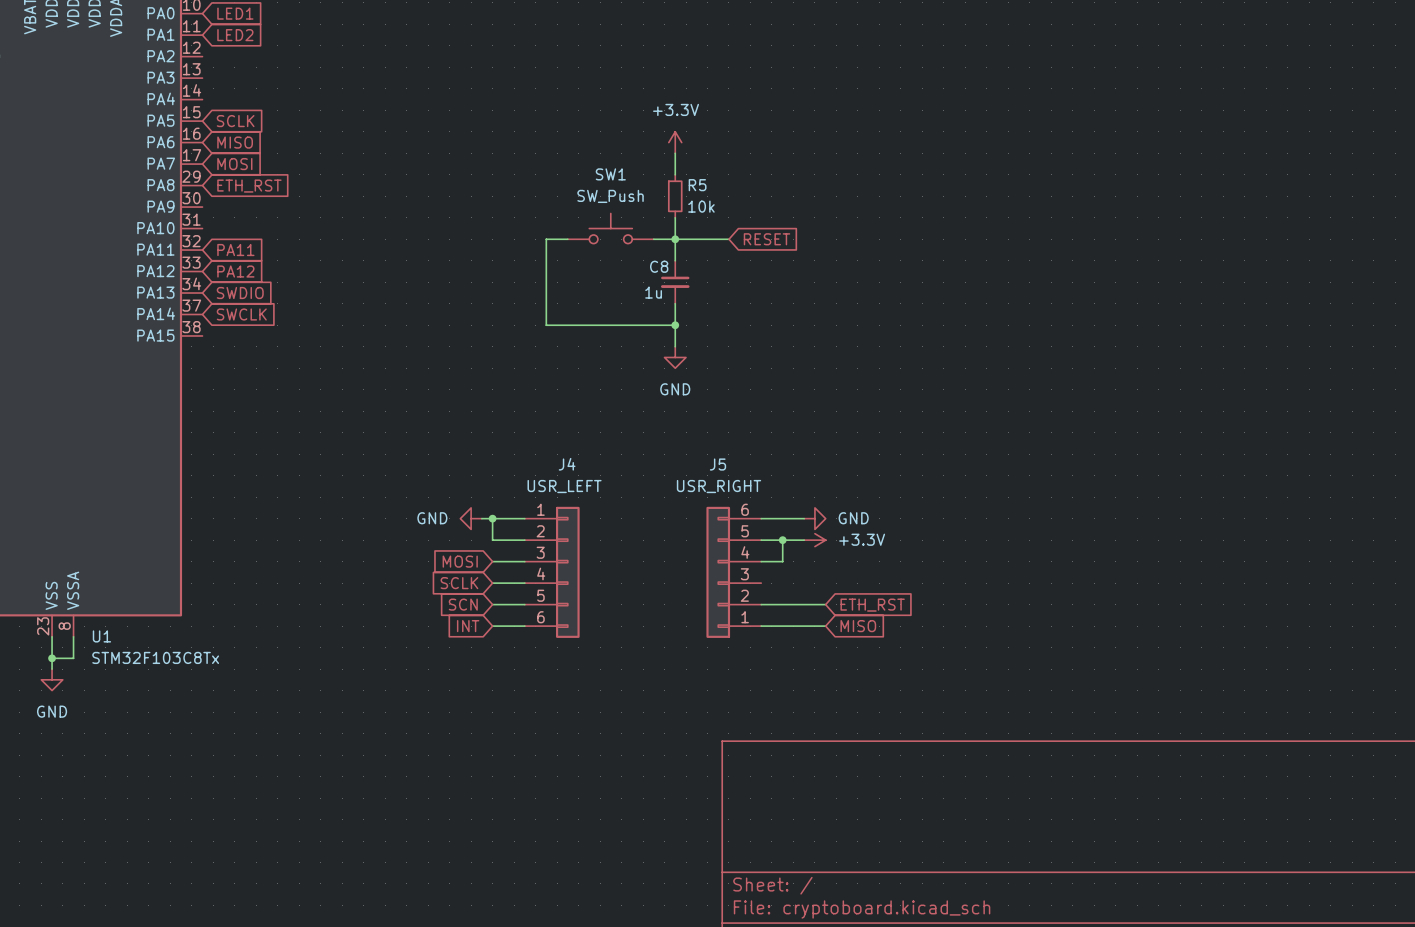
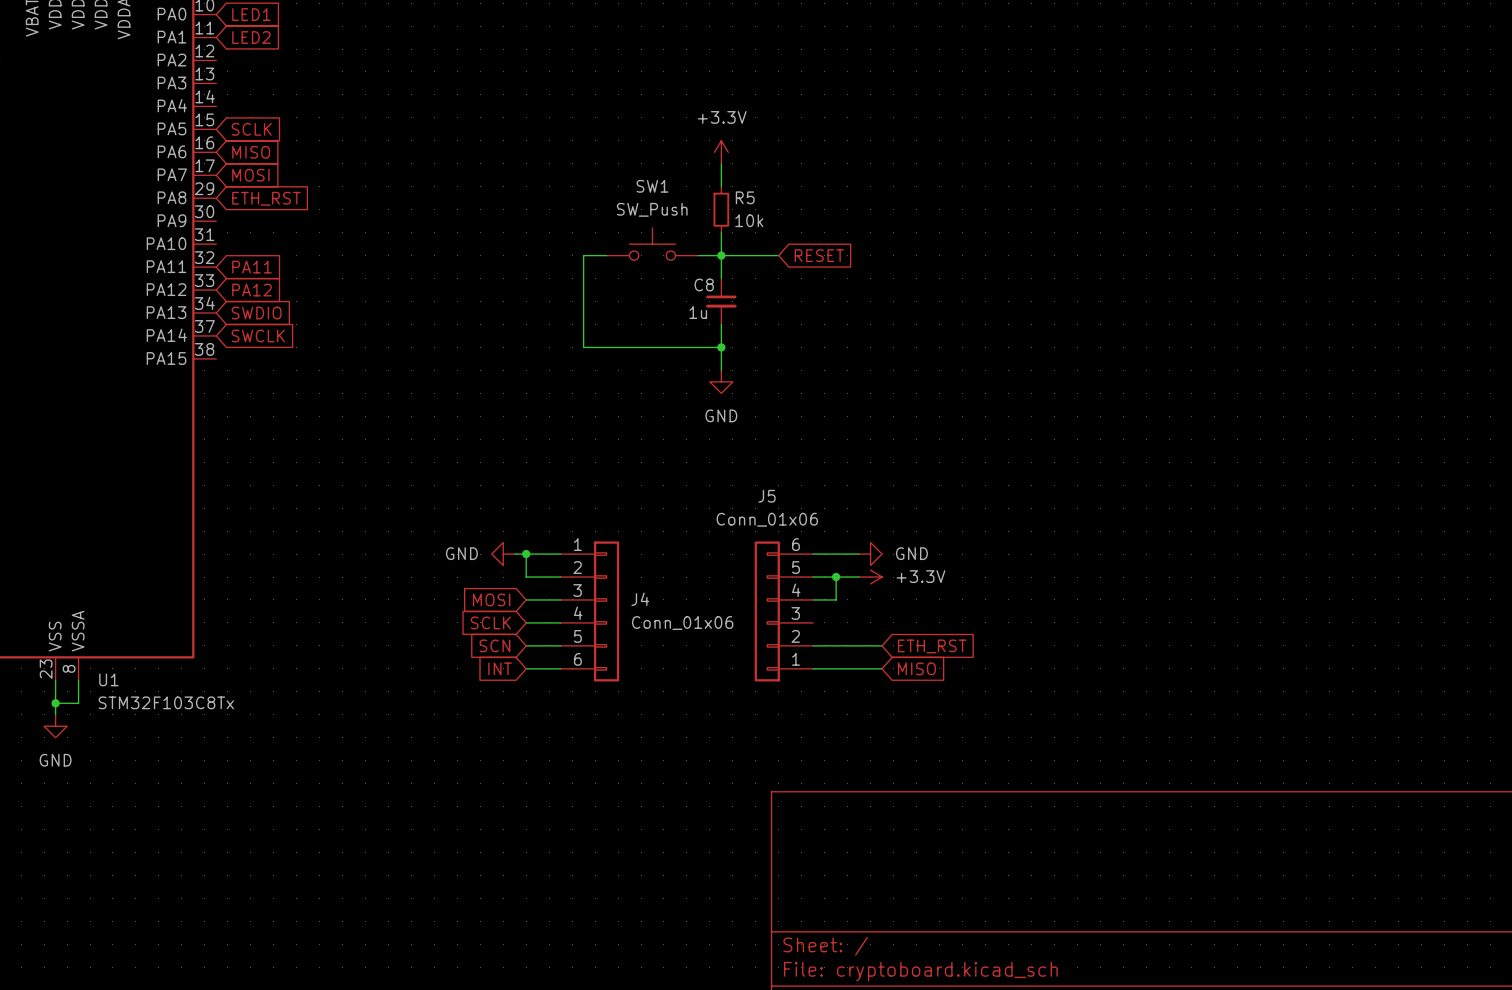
J4 name position: J4 (567, 464) -> J4 (640, 599)
J4 value: USR_LEFT (564, 486) -> Conn_01x06 (682, 623)
J5 value: USR_RIGHT (719, 486) -> Conn_01x06 (767, 519)

